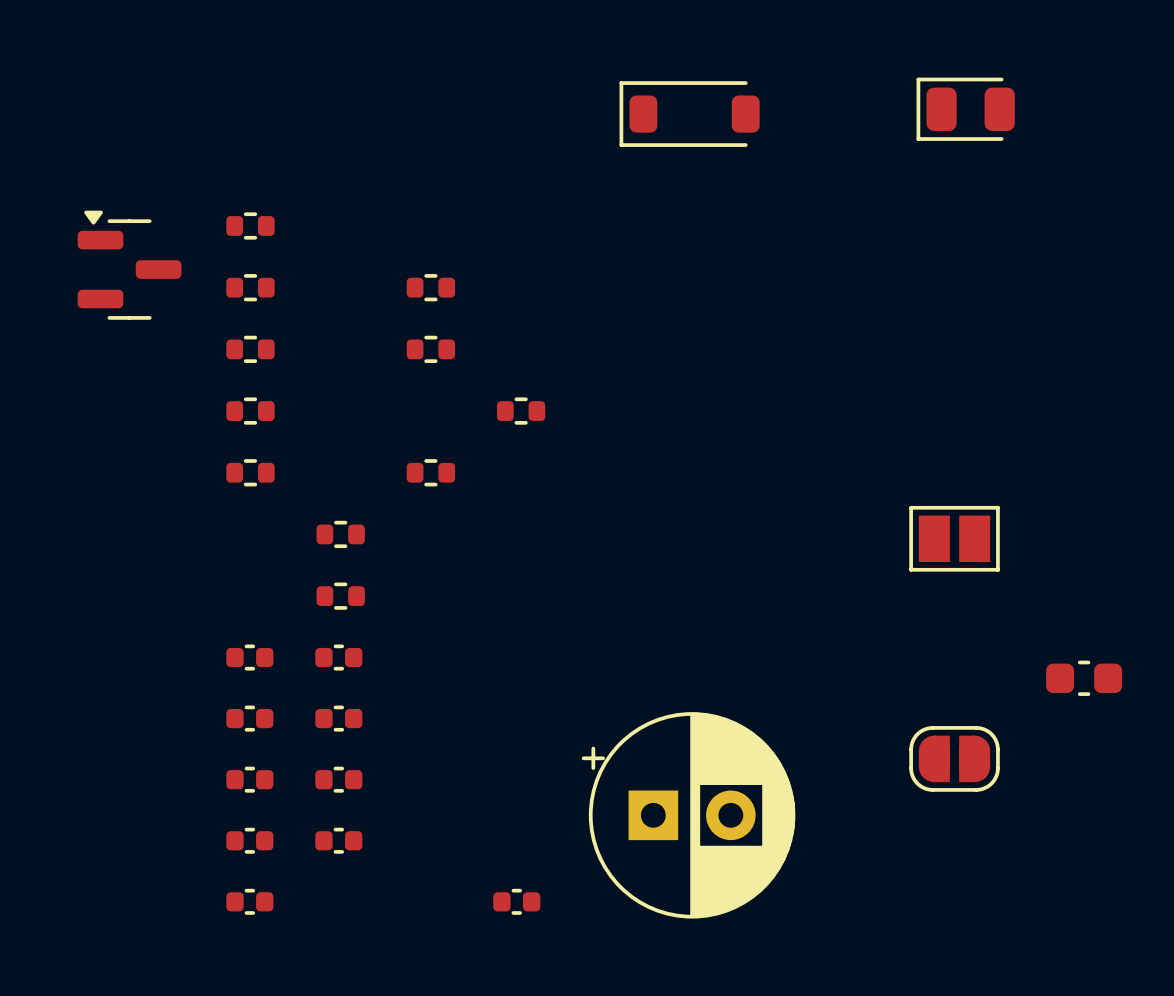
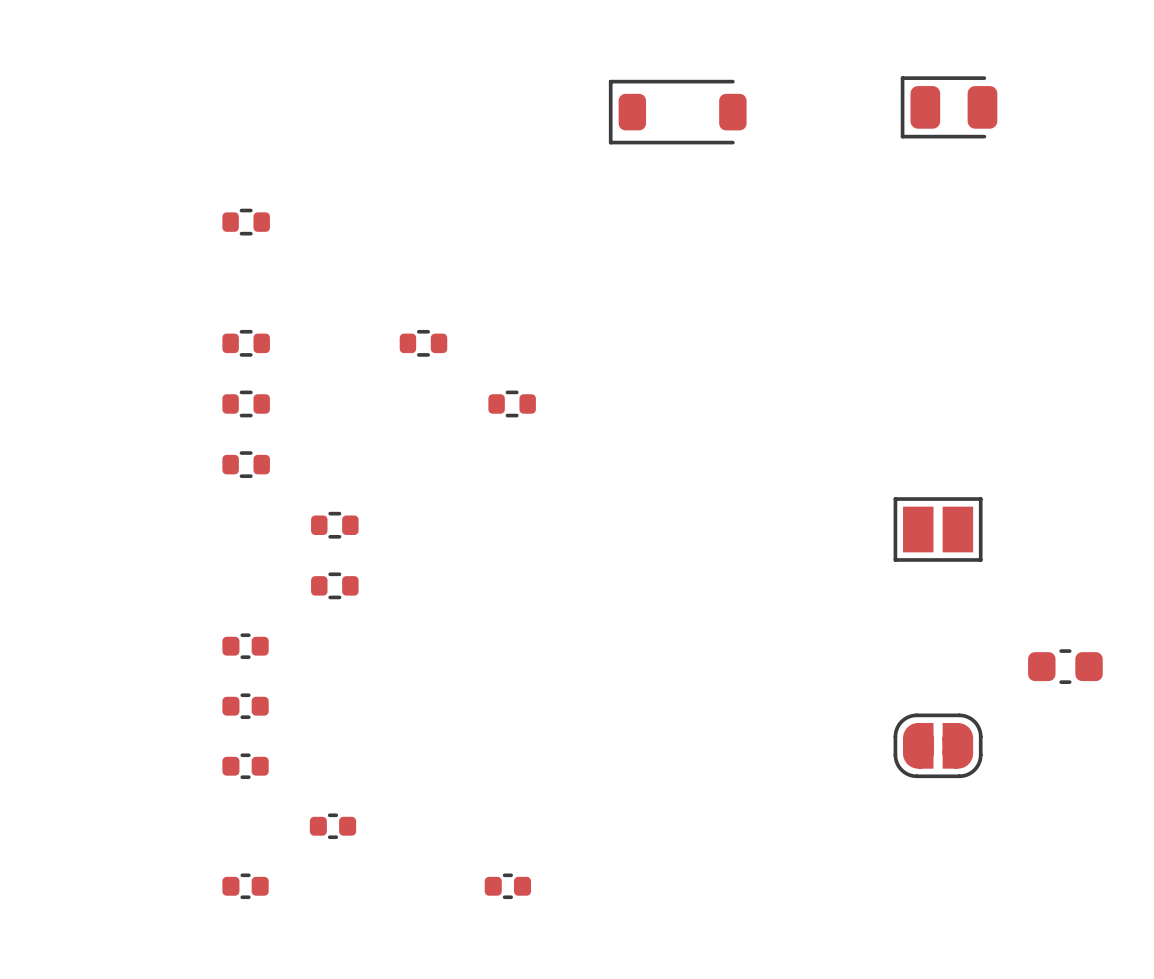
part: (129, 265) -> none
part: (250, 287) -> none
part: (430, 287) -> none
part: (430, 472) -> none
part: (338, 657) -> none
part: (338, 718) -> none
part: (338, 779) -> none
part: (688, 815) -> none
part: (249, 840) -> none

